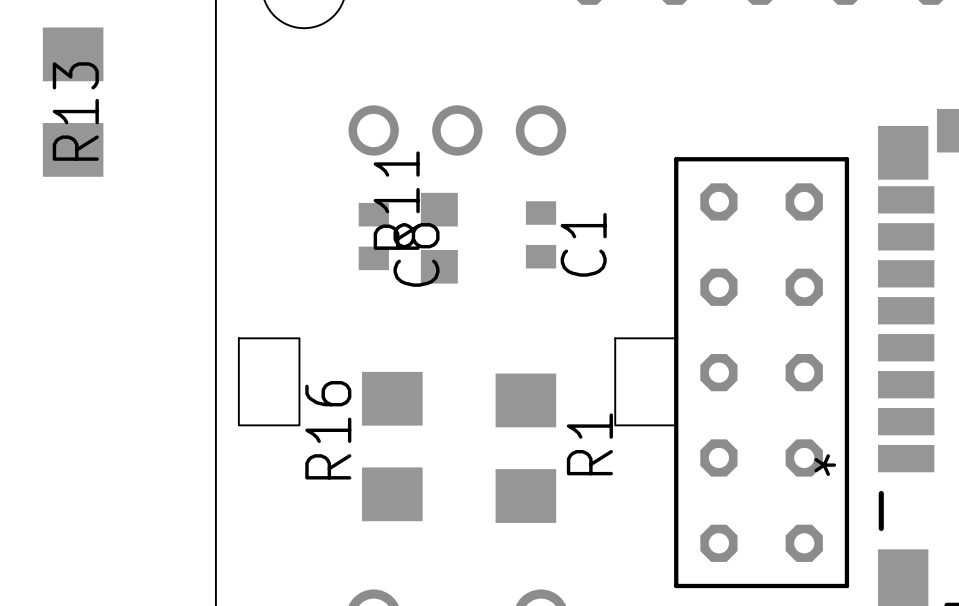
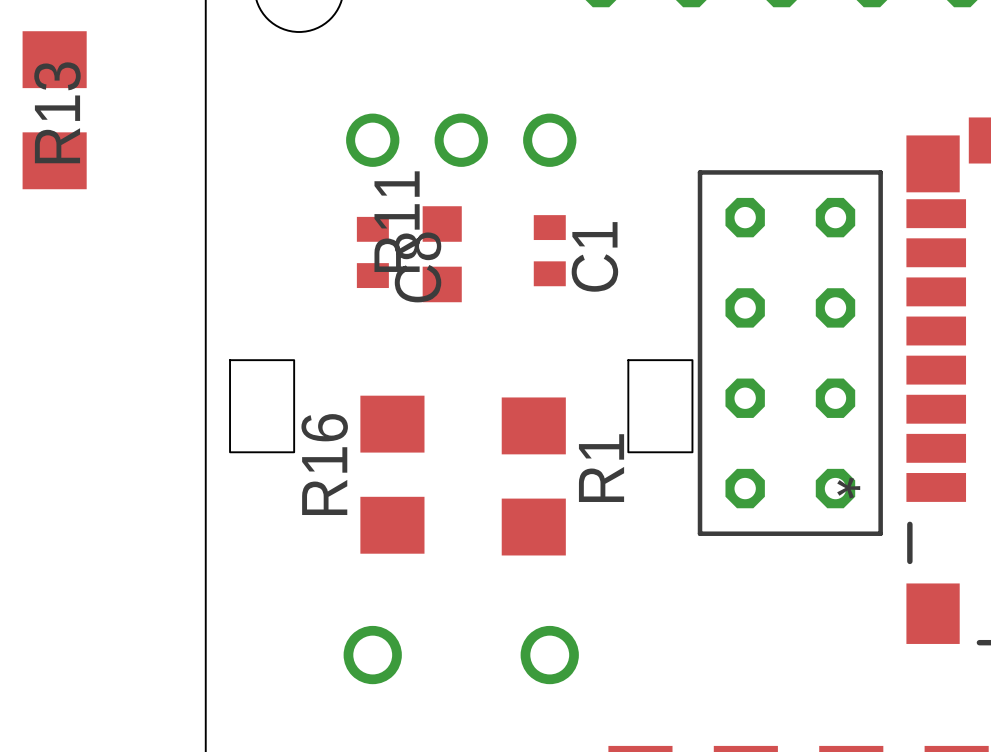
part: none -> (790, 353)
part: (761, 372) -> none

